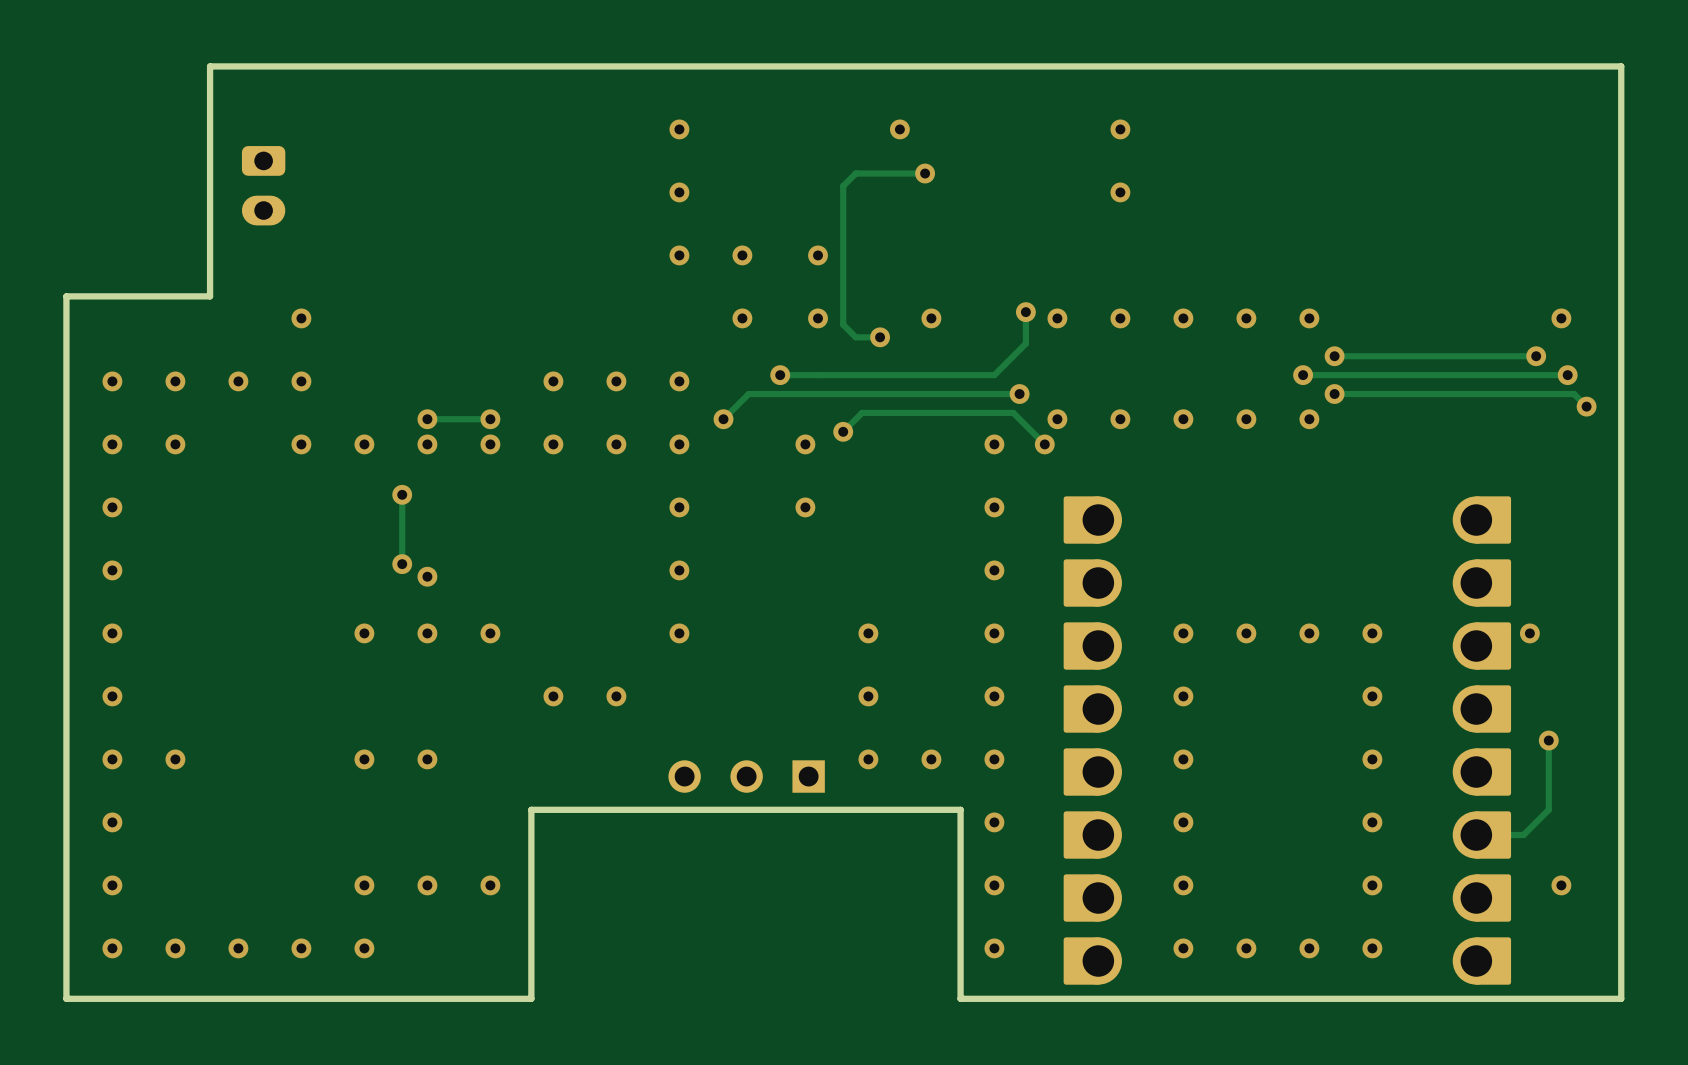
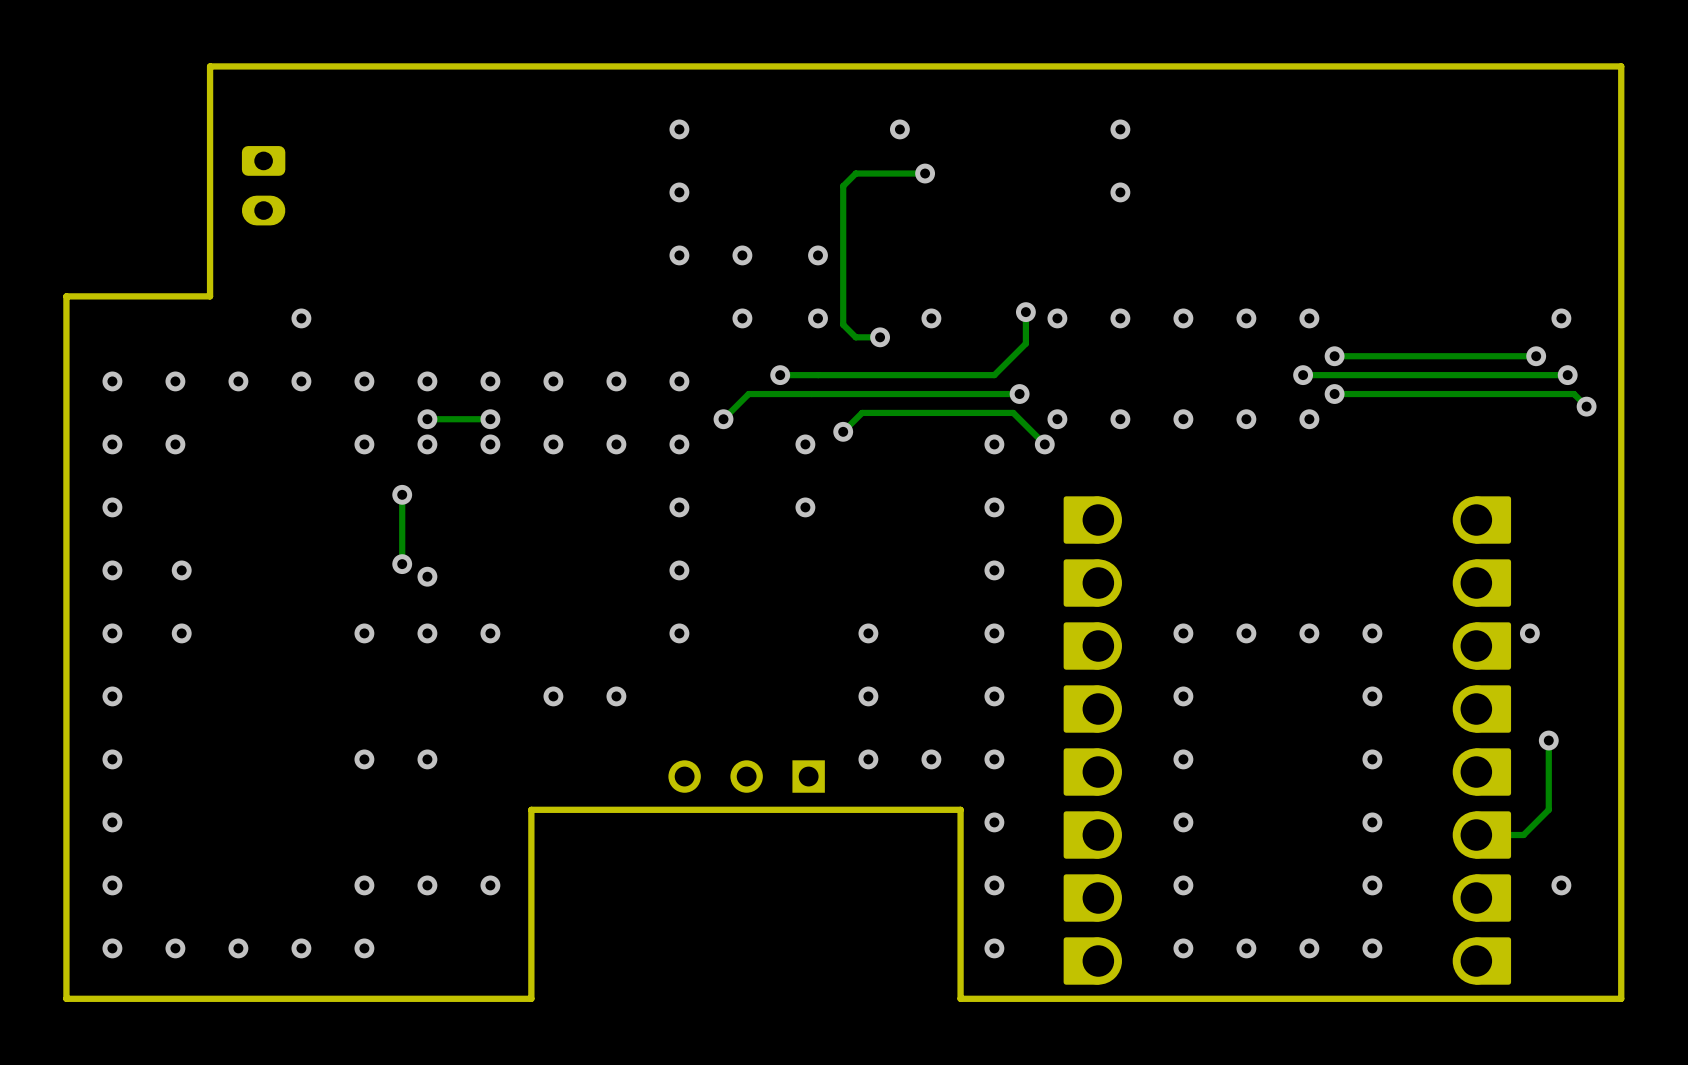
via: none -> (364, 381)
via: none -> (427, 381)
via: none -> (490, 381)
via: (301, 444) -> none
via: none -> (181, 570)
via: none -> (181, 633)
via: (175, 759) -> none

